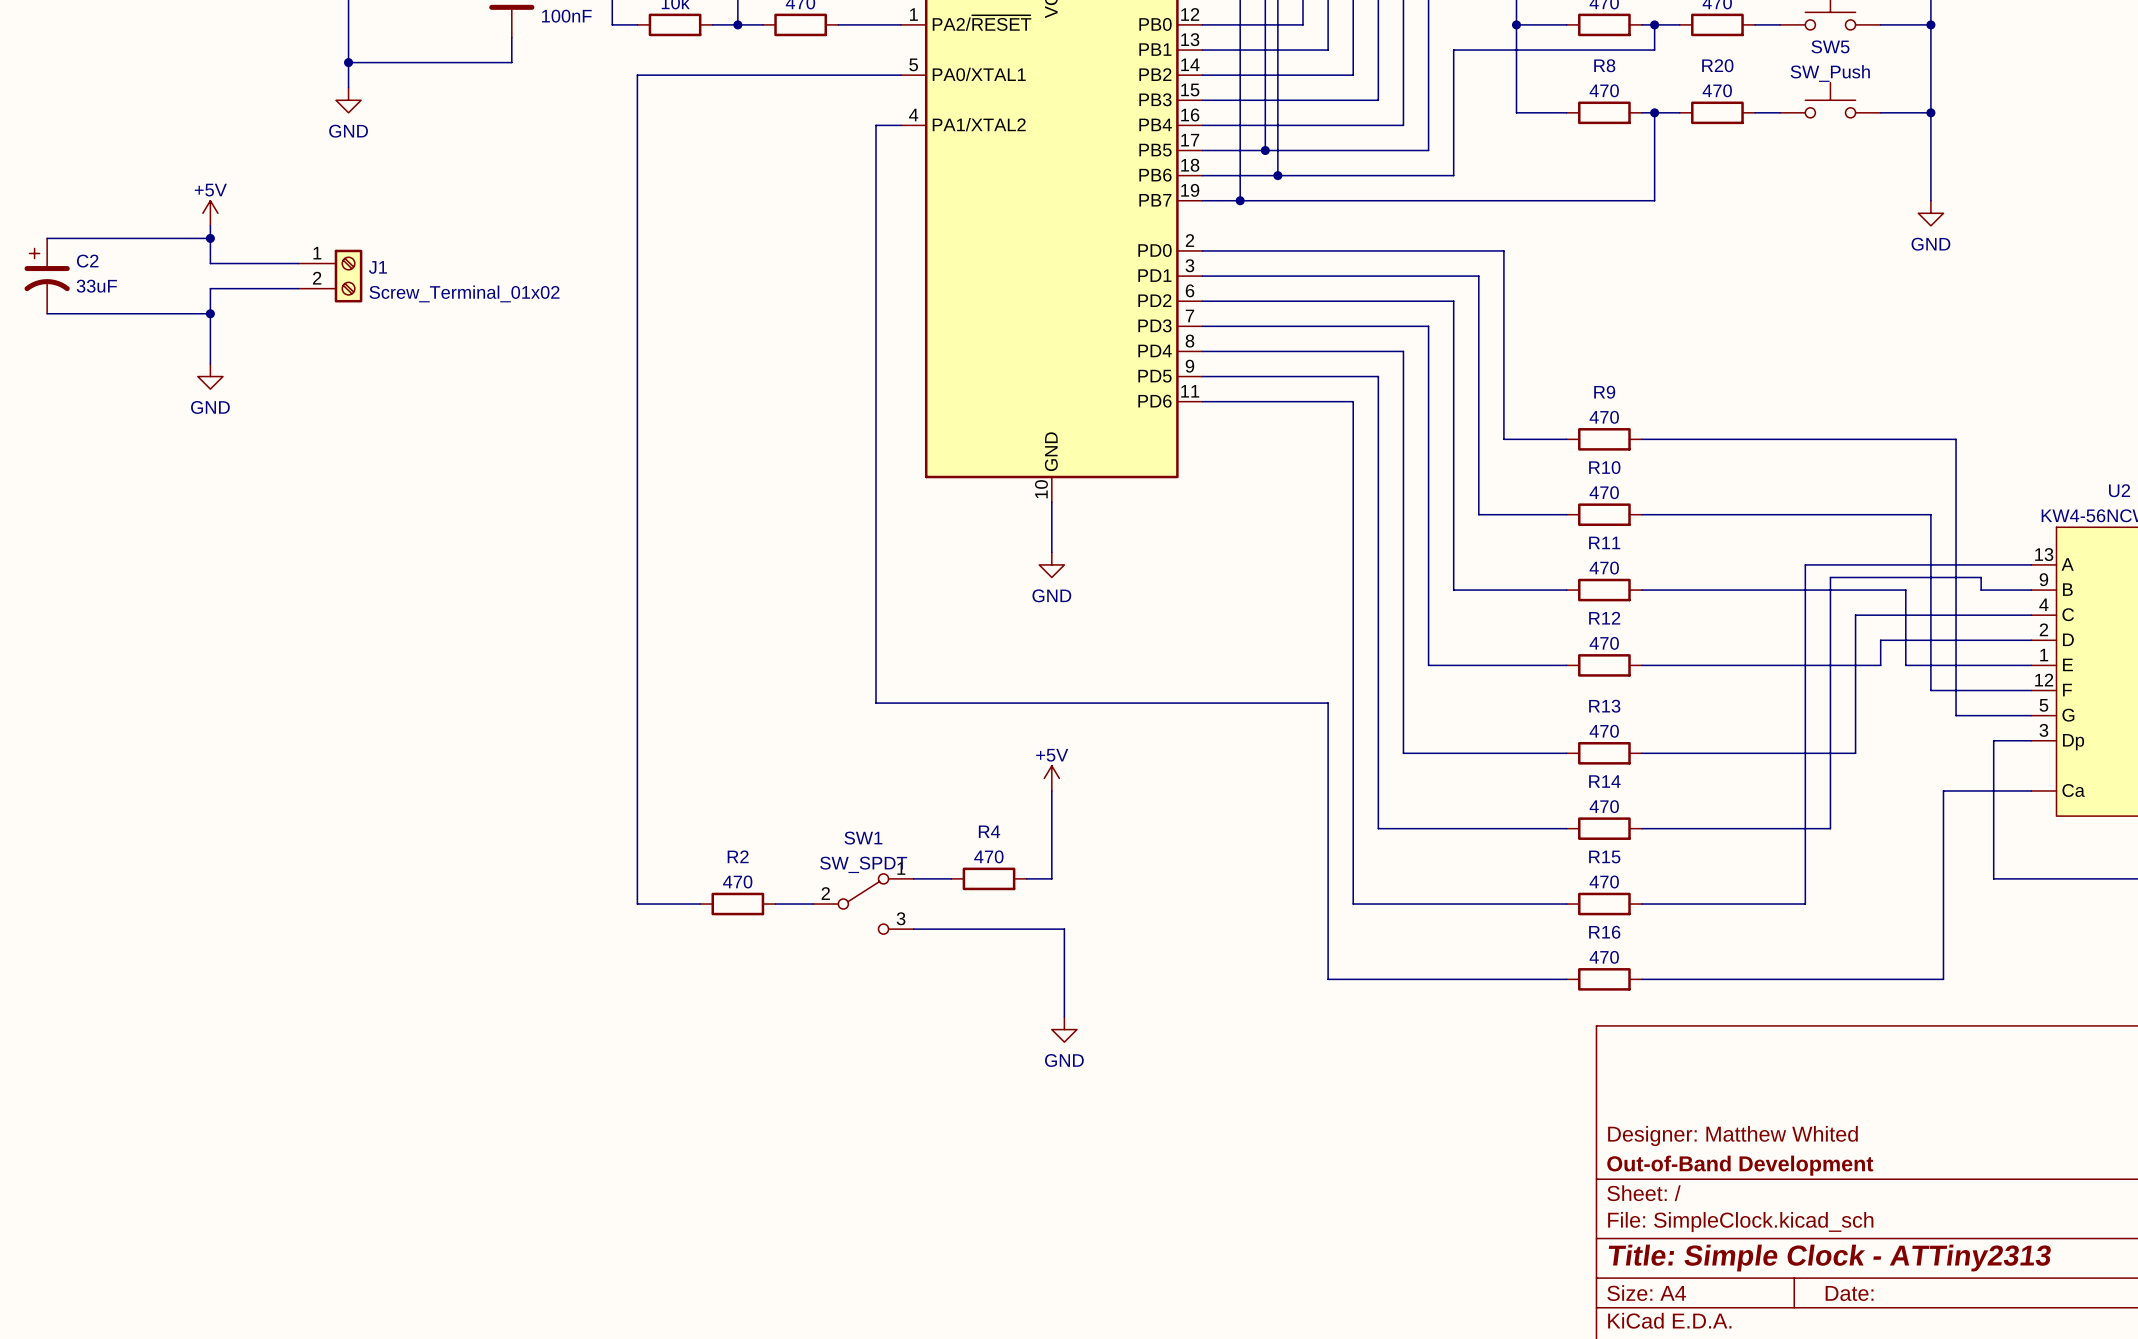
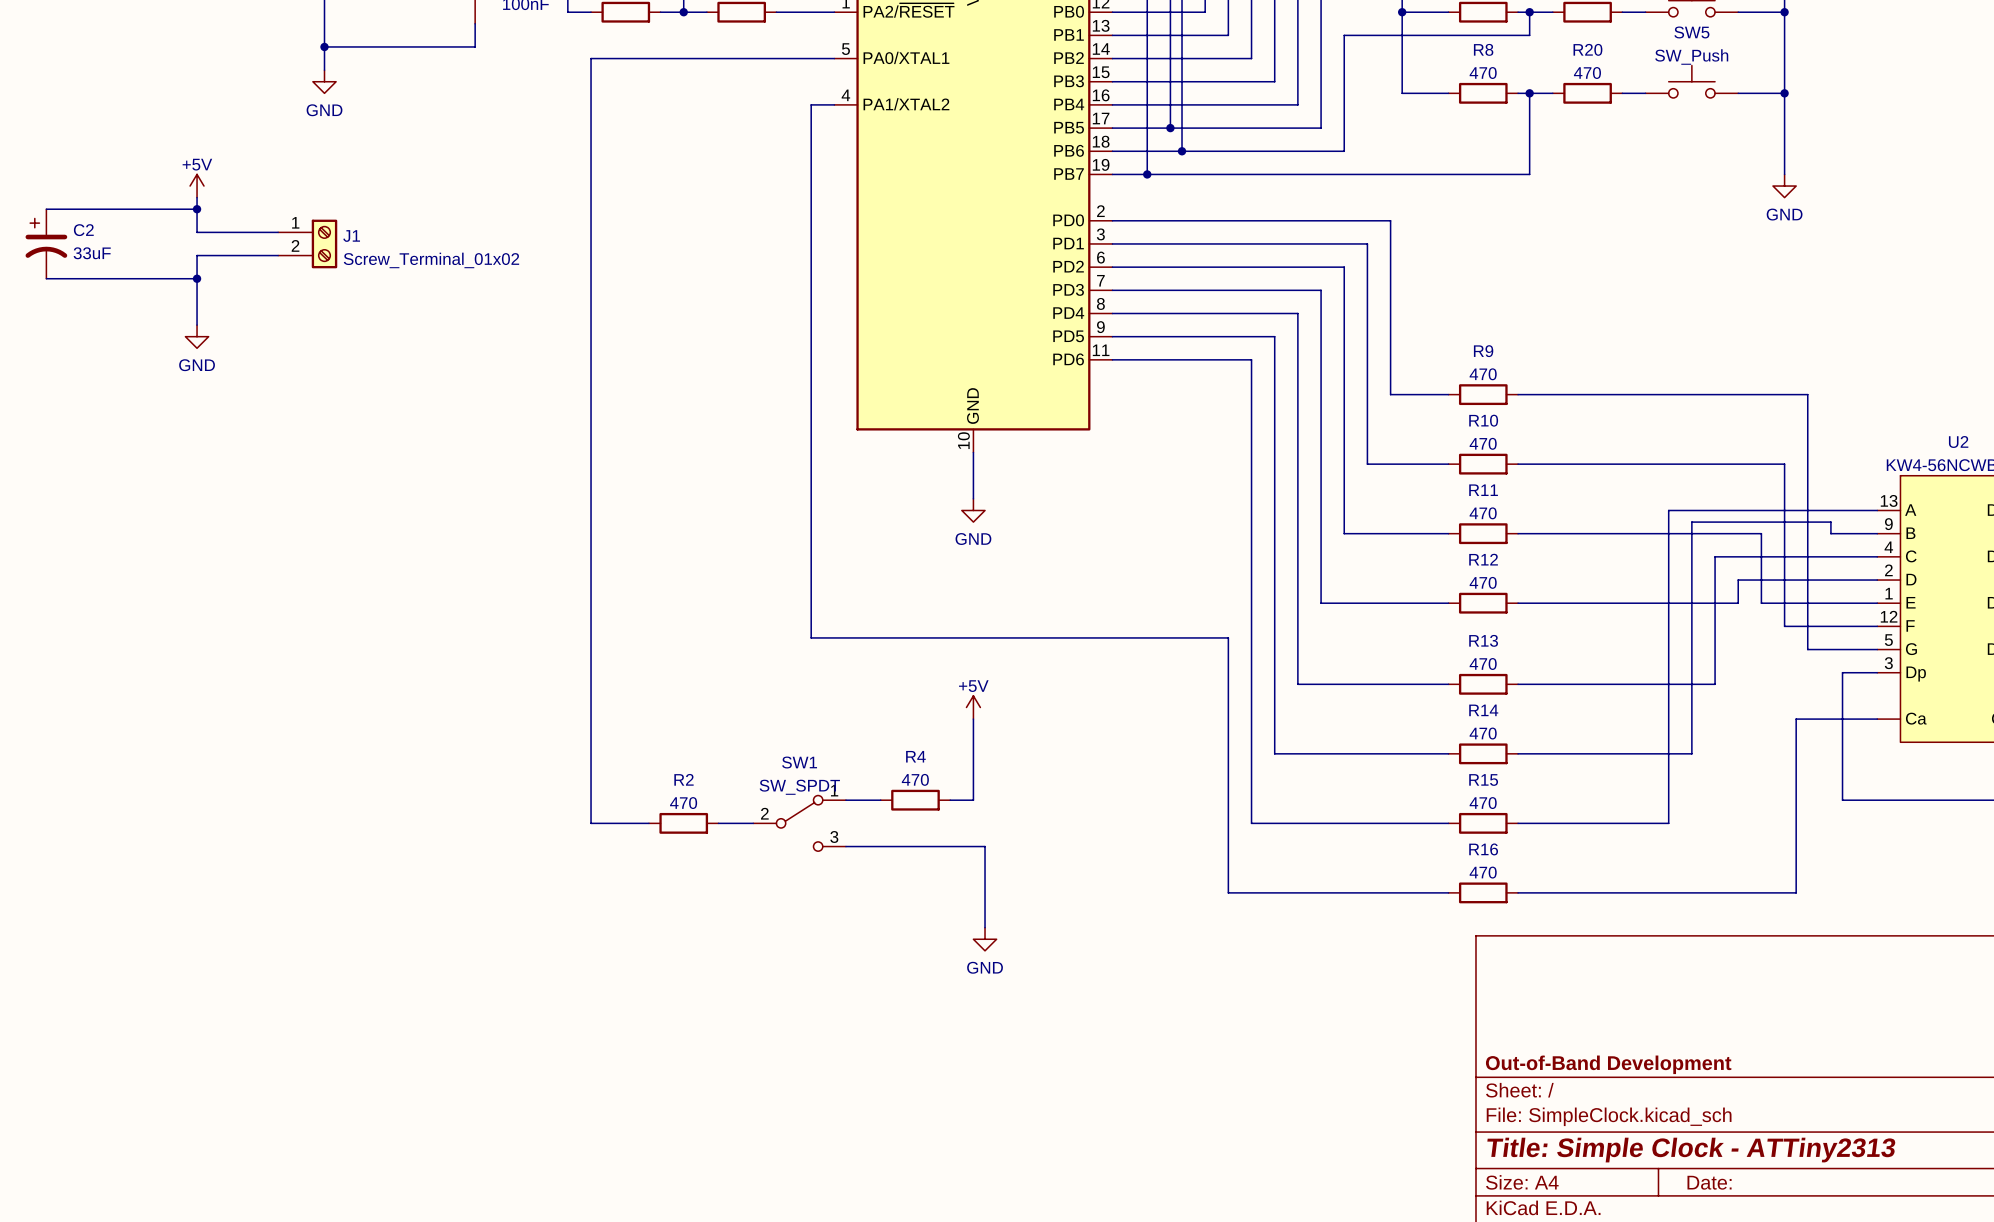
title block: Designer: Matthew Whited (1732, 1136) -> none

